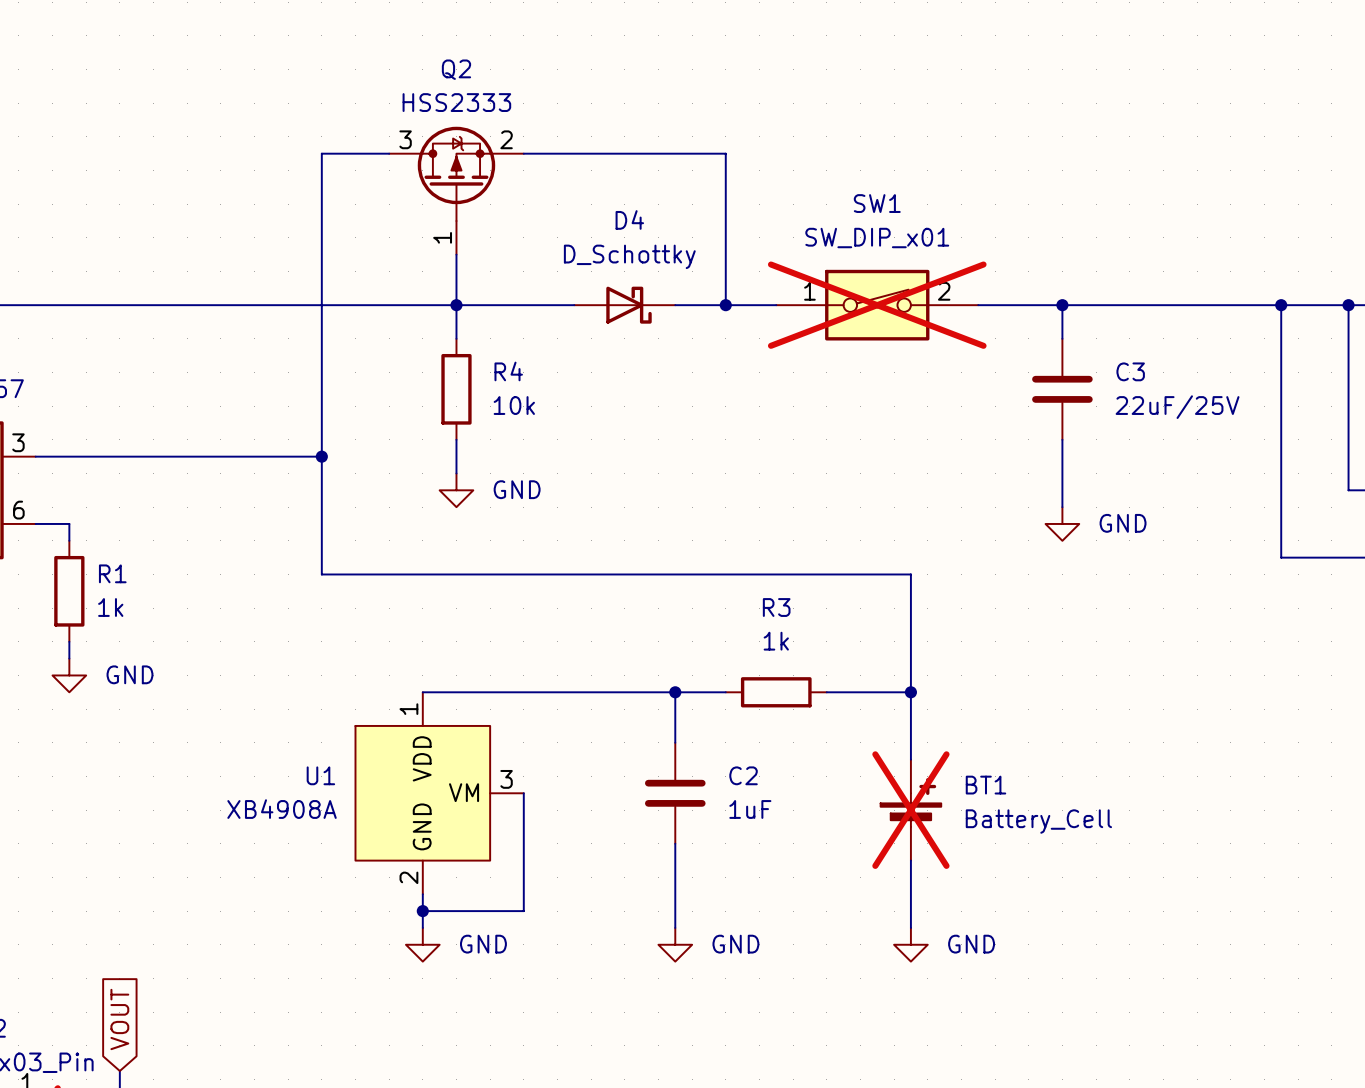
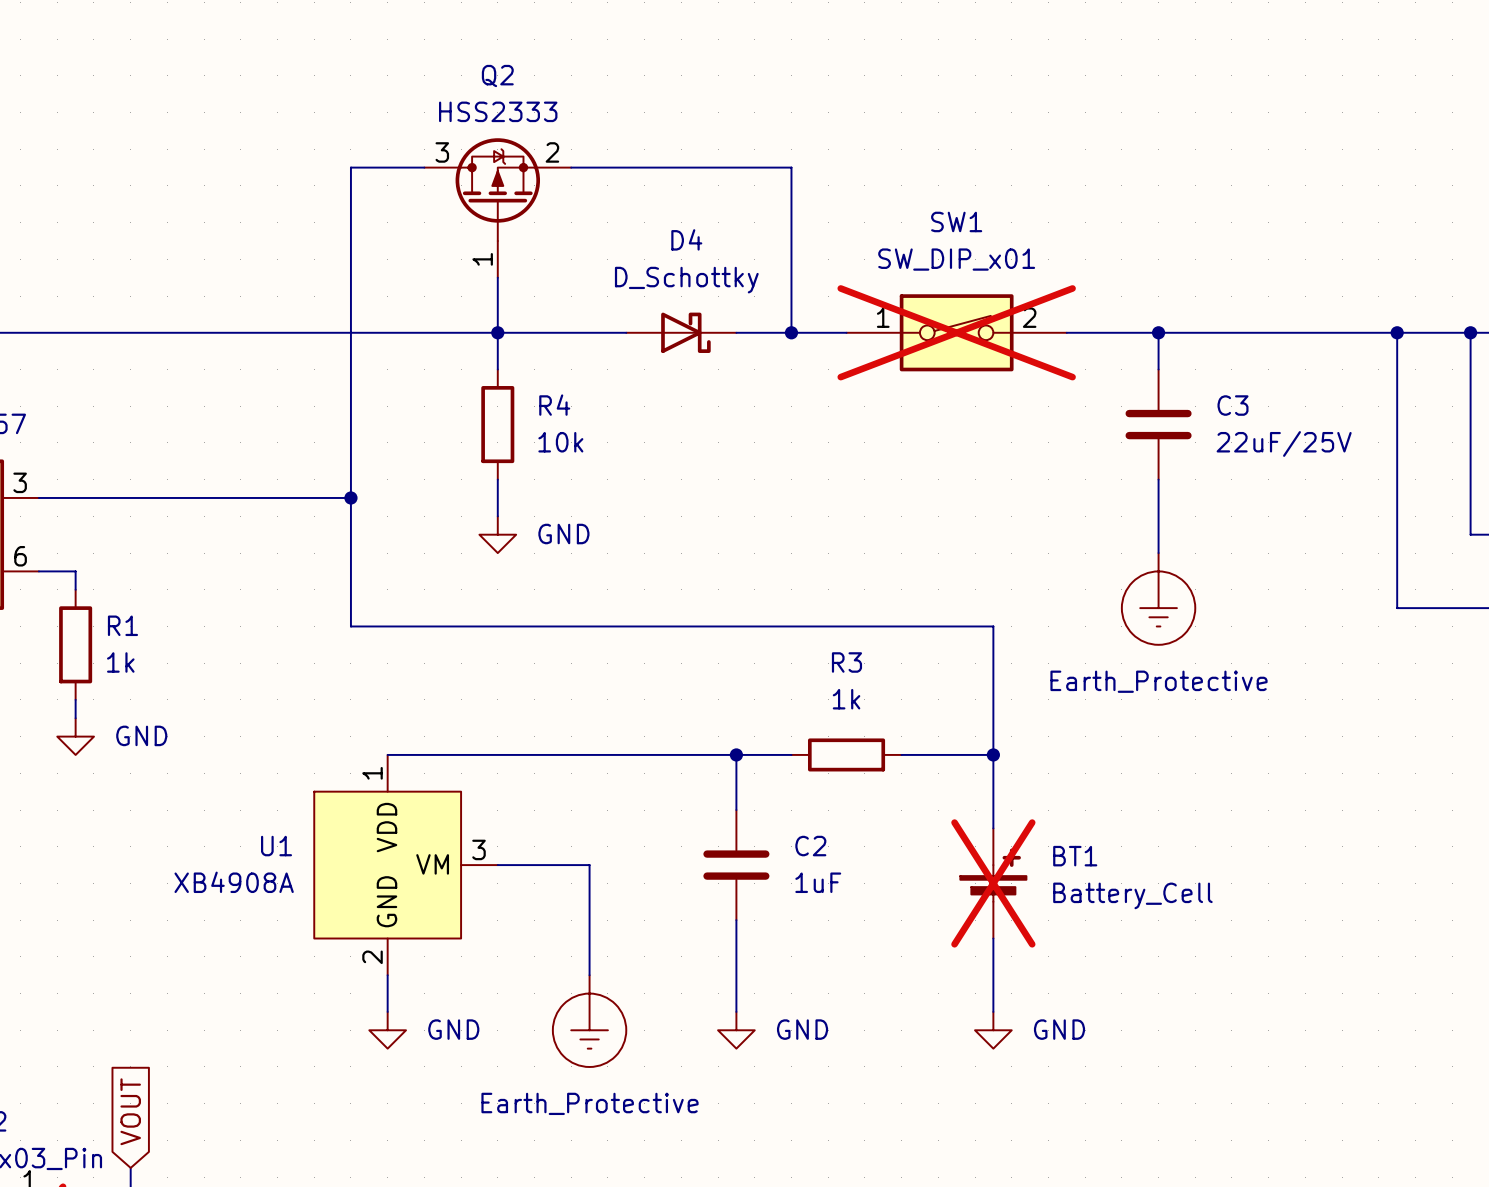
power symbol: GND (1062, 523) -> none
power symbol: none -> Earth_Protective (1158, 598)
wire: none -> (387, 754) (461, 754)
U1 position: (439, 793) -> (406, 865)
wire: none -> (497, 865) (589, 865) (589, 975)
wire: (523, 793) (523, 911) (422, 911) -> none
wire: (422, 894) (422, 927) -> (387, 975) (387, 1011)
junction: (422, 911) -> none
power symbol: none -> Earth_Protective (589, 1021)
power symbol position: GND (422, 944) -> GND (387, 1030)

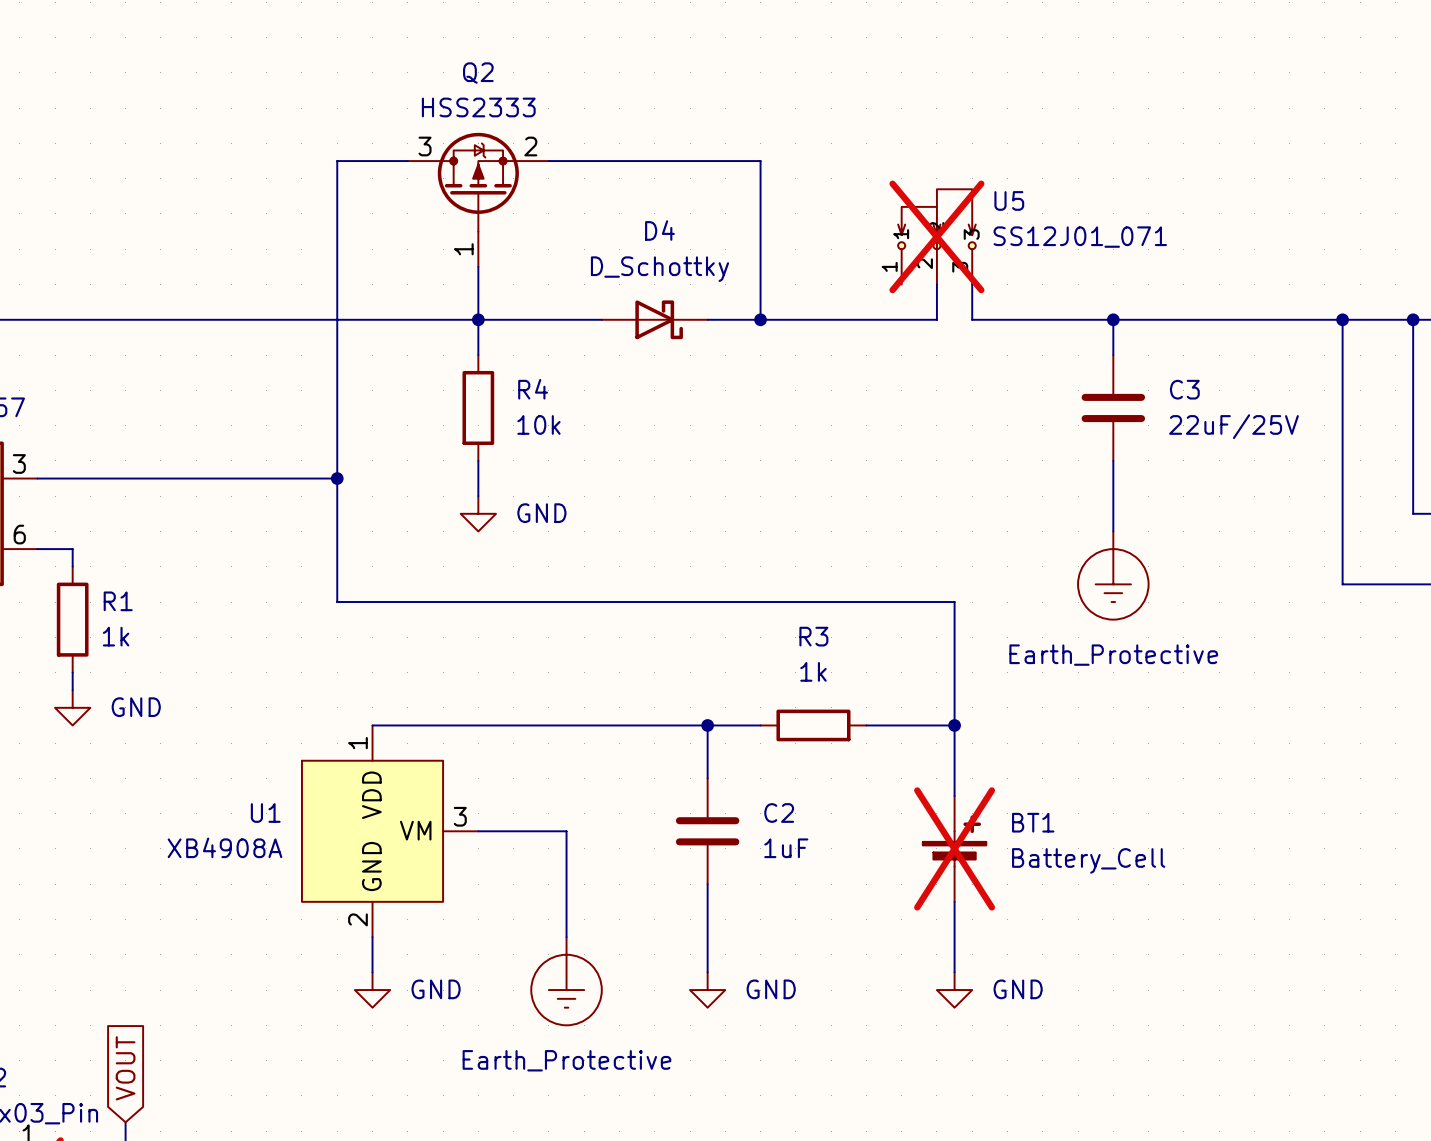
U5: none -> SS12J01_071 (936, 236)
SW1: SW_DIP_x01 (956, 332) -> none

